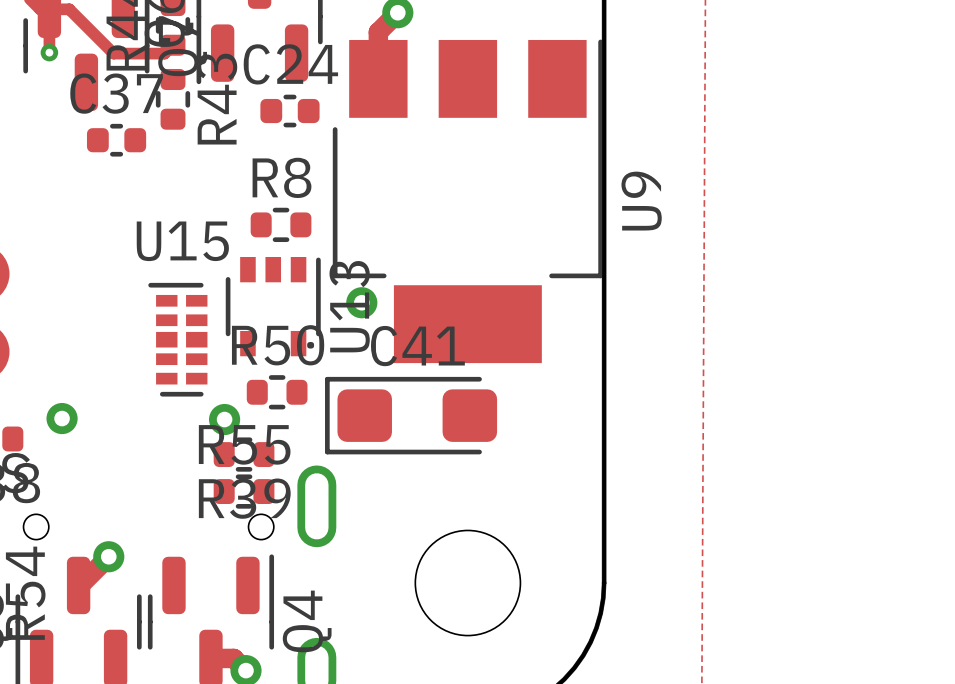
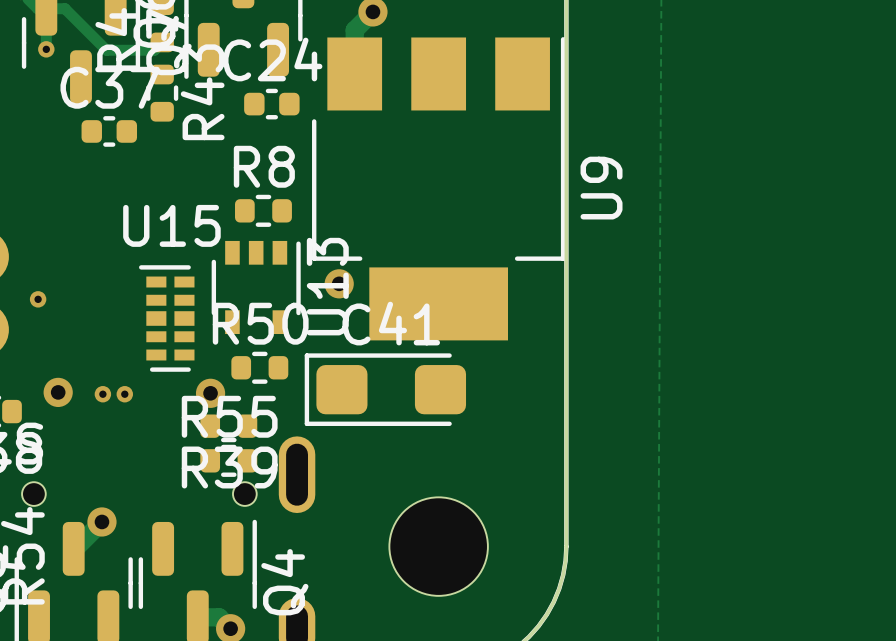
via: none -> (38, 299)
via: none -> (102, 394)
via: none -> (124, 394)

